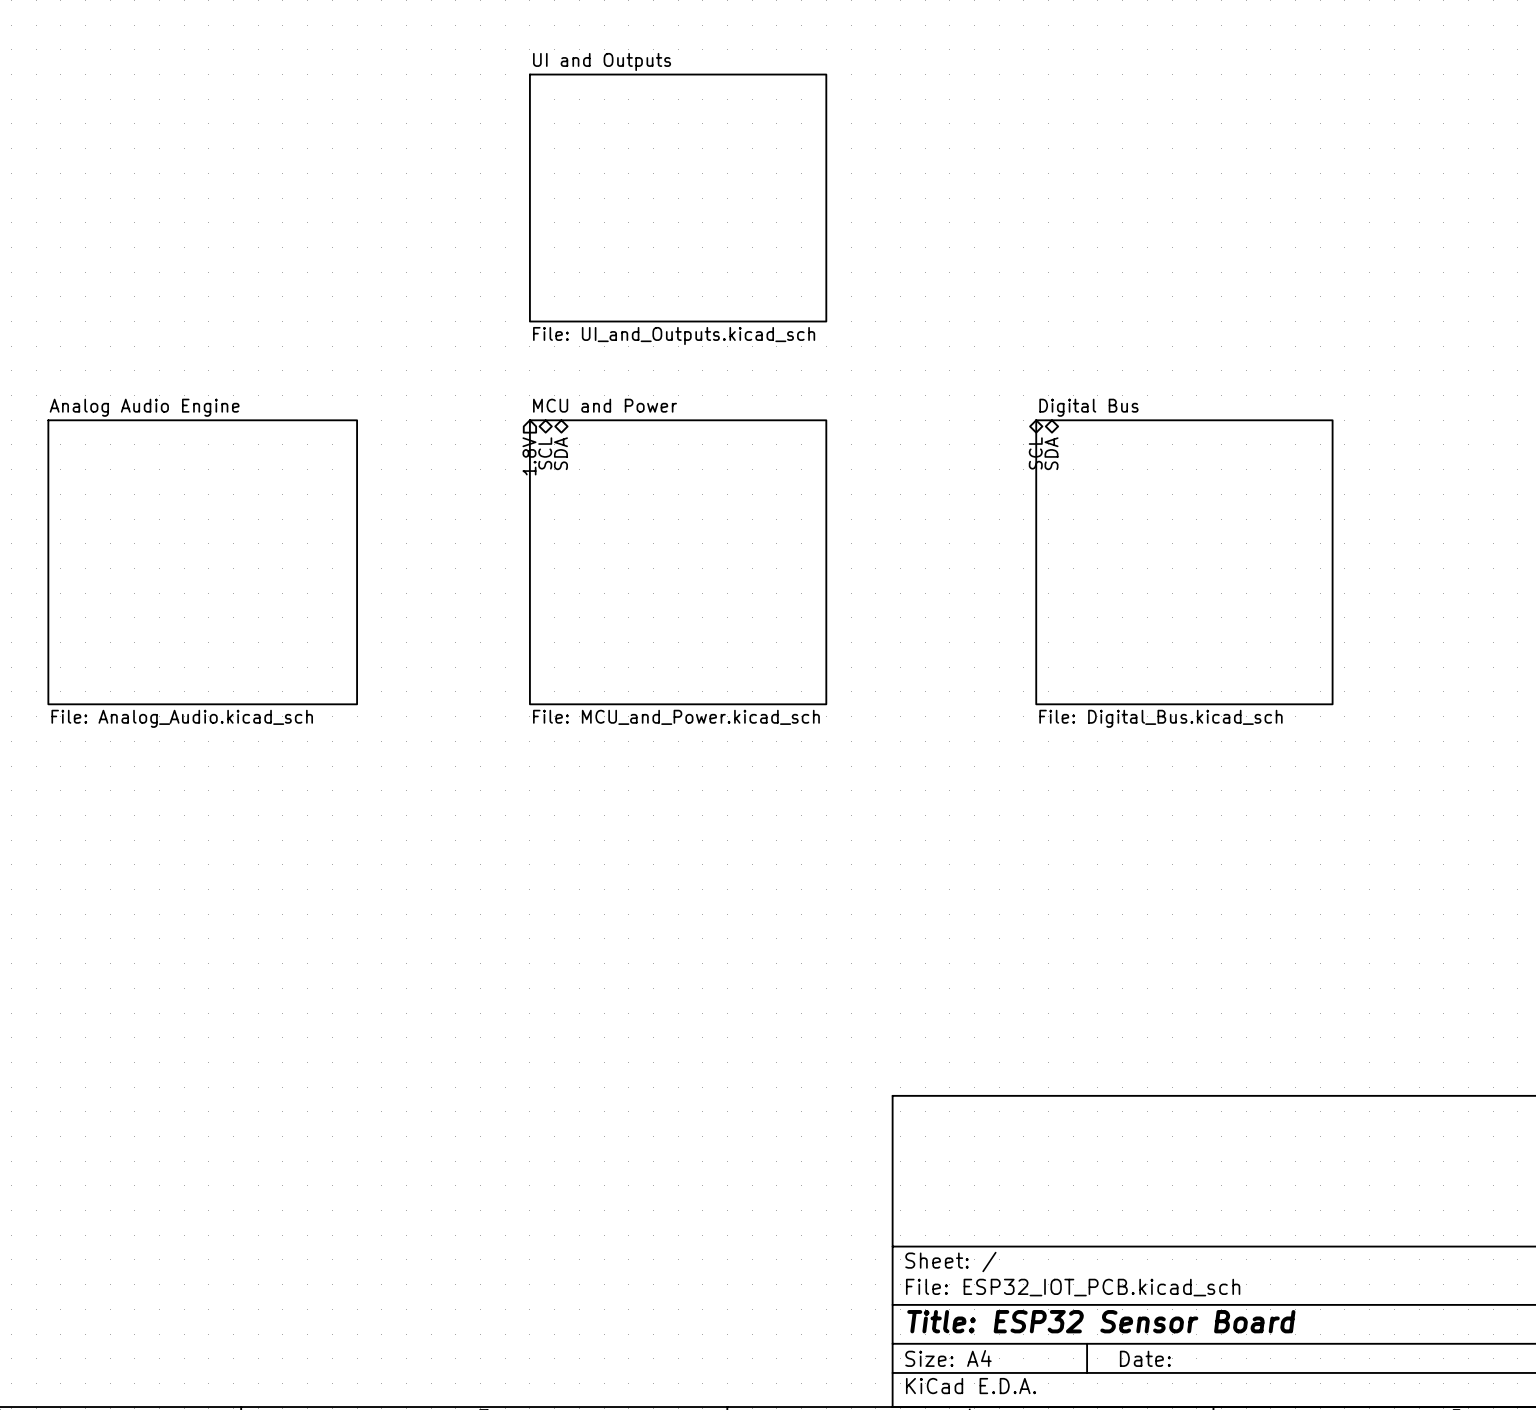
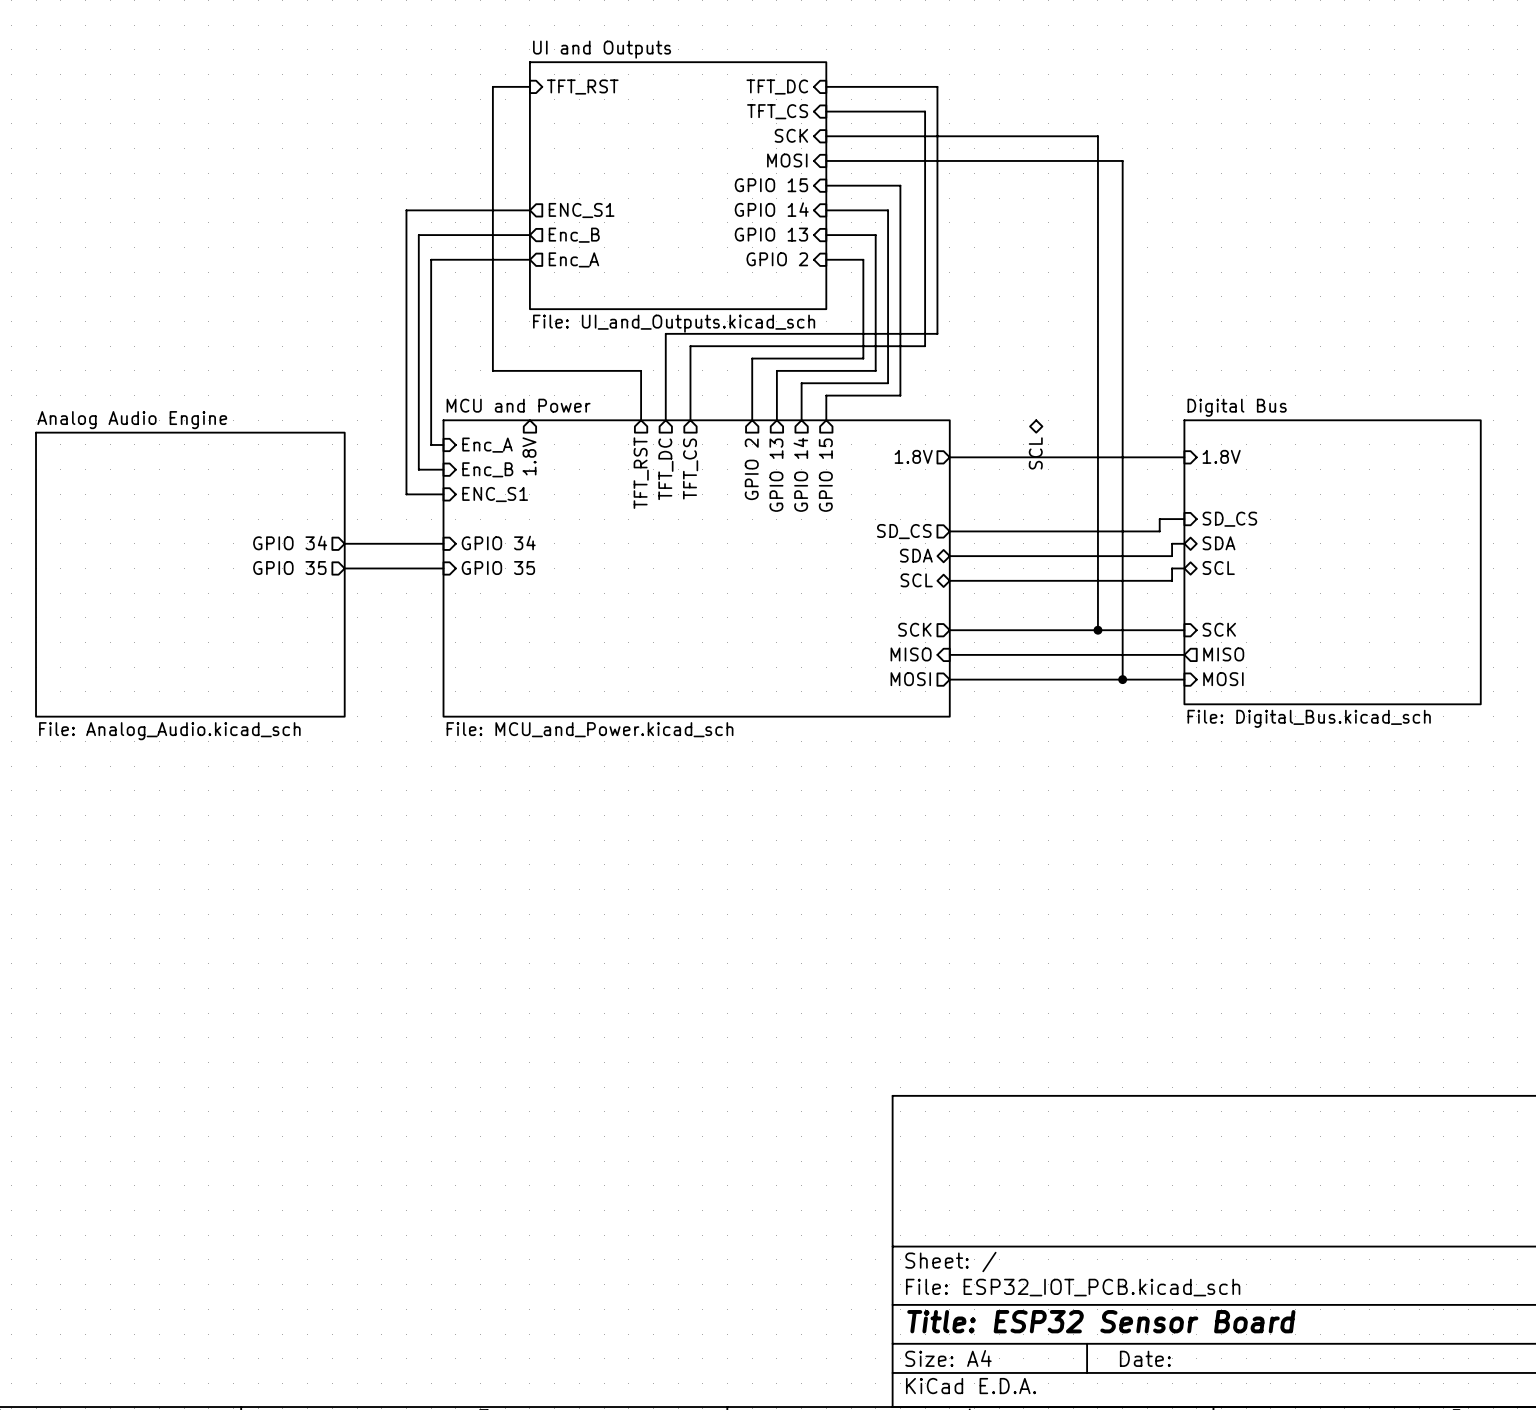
wire: none -> (529, 86) (492, 86) (492, 370) (641, 370) (641, 420)
wire: none -> (826, 86) (937, 86) (937, 333) (665, 333) (665, 420)
sheet pin: none -> TFT_RST (582, 87)
sheet pin: none -> TFT_DC (777, 87)
sheet pin: none -> TFT_CS (777, 111)
wire: none -> (826, 111) (925, 111) (925, 346) (690, 346) (690, 420)
sheet pin: none -> SCK (791, 135)
wire: none -> (826, 136) (1097, 136) (1097, 630)
sheet pin: none -> MOSI (787, 160)
wire: none -> (826, 160) (1122, 160) (1122, 679)
sheet pin: none -> GPIO 15 (771, 185)
wire: none -> (826, 185) (900, 185) (900, 395) (826, 395) (826, 420)
sheet UI and Outputs position: (678, 198) -> (678, 185)
sheet pin: none -> GPIO 14 (771, 209)
wire: none -> (529, 210) (406, 210) (406, 494) (443, 494)
sheet pin: none -> ENC_S1 (581, 210)
wire: none -> (826, 210) (888, 210) (888, 383) (801, 383) (801, 420)
sheet pin: none -> GPIO 13 (771, 234)
wire: none -> (529, 235) (418, 235) (418, 469) (443, 469)
sheet pin: none -> Enc_B (574, 235)
wire: none -> (826, 235) (875, 235) (875, 370) (776, 370) (776, 420)
wire: none -> (529, 259) (431, 259) (431, 444) (443, 444)
sheet pin: none -> Enc_A (573, 259)
sheet pin: none -> GPIO 2 (777, 259)
wire: none -> (826, 259) (863, 259) (863, 358) (752, 358) (752, 420)
sheet pin: none -> Enc_A (487, 445)
sheet pin: SCL (545, 453) -> none
sheet pin: SDA (560, 453) -> none
sheet pin: SDA (1051, 453) -> none
sheet pin: none -> 1.8V (913, 456)
sheet pin: none -> 1.8V (1221, 456)
wire: none -> (949, 457) (1184, 457)
sheet pin: none -> Enc_B (487, 469)
sheet pin: none -> TFT_DC (665, 469)
sheet pin: none -> TFT_CS (690, 469)
sheet pin: none -> GPIO 2 (751, 469)
sheet pin: none -> TFT_RST (641, 473)
sheet pin: none -> GPIO 14 (800, 474)
sheet pin: none -> GPIO 13 (776, 475)
sheet pin: none -> GPIO 15 (825, 475)
sheet pin: none -> ENC_S1 (495, 494)
wire: none -> (1184, 519) (1159, 519) (1159, 531) (949, 531)
sheet pin: none -> SD_CS (1229, 519)
sheet pin: none -> SD_CS (904, 531)
sheet pin: none -> GPIO 34 (290, 543)
wire: none -> (344, 543) (443, 543)
sheet pin: none -> GPIO 34 (498, 543)
wire: none -> (1184, 543) (1172, 543) (1172, 556) (949, 556)
sheet pin: none -> SDA (1219, 543)
sheet pin: none -> SDA (916, 555)
sheet Analog Audio Engine position: (202, 562) -> (190, 574)
sheet MCU and Power: File: MCU_and_Power.kicad_sch (678, 562) -> none
sheet Digital Bus position: (1184, 562) -> (1332, 562)
sheet pin: none -> GPIO 35 (289, 568)
wire: none -> (344, 568) (443, 568)
sheet pin: none -> GPIO 35 (498, 568)
sheet MCU and Power: none -> File: MCU_and_Power.kicad_sch (696, 568)
wire: none -> (1184, 568) (1172, 568) (1172, 580) (949, 580)
sheet pin: none -> SCL (1218, 568)
sheet pin: none -> SCL (916, 580)
sheet pin: none -> SCK (914, 629)
sheet pin: none -> SCK (1219, 629)
wire: none -> (949, 630) (1184, 630)
junction: none -> (1097, 630)
sheet pin: none -> MISO (911, 654)
wire: none -> (949, 654) (1184, 654)
sheet pin: none -> MISO (1223, 654)
sheet pin: none -> MOSI (910, 679)
wire: none -> (949, 679) (1184, 679)
junction: none -> (1122, 679)
sheet pin: none -> MOSI (1223, 679)

